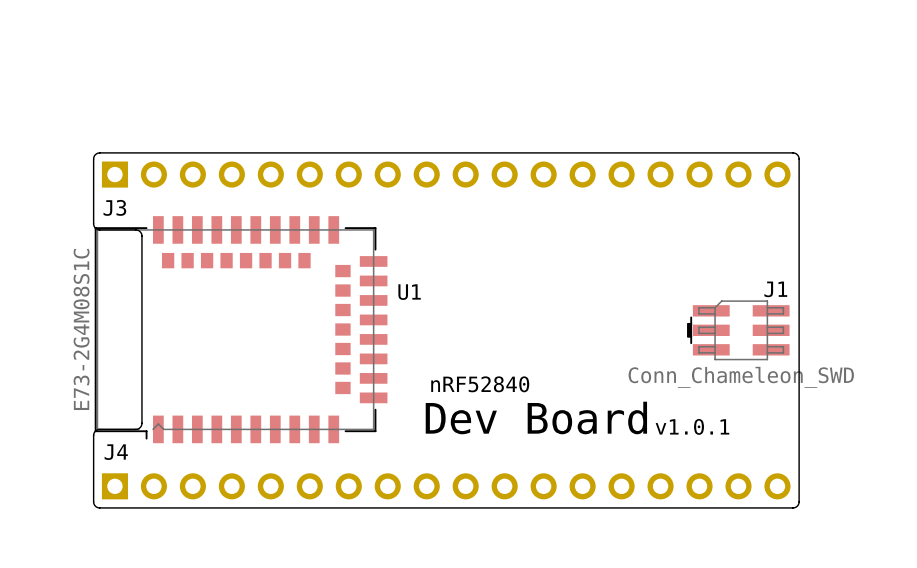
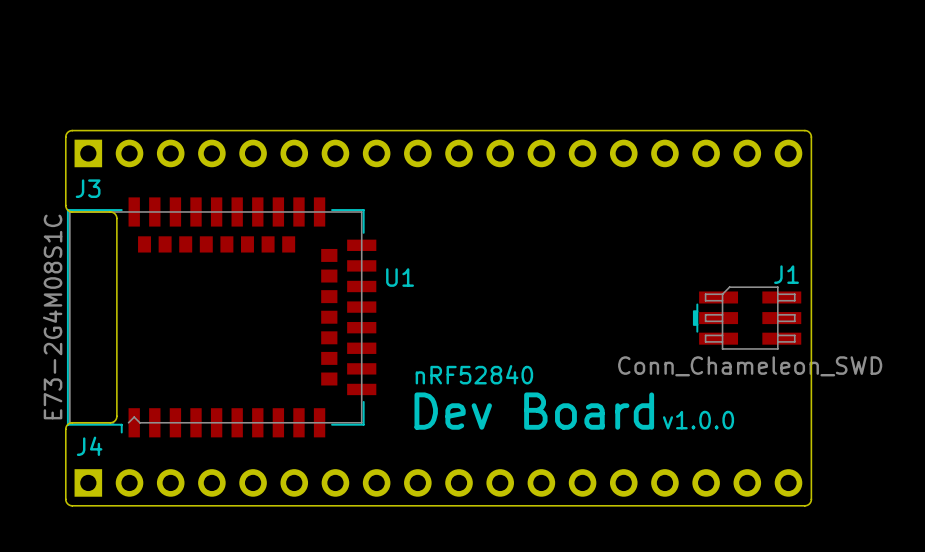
text: v1.0.1 (692, 426) -> v1.0.0 (698, 420)

